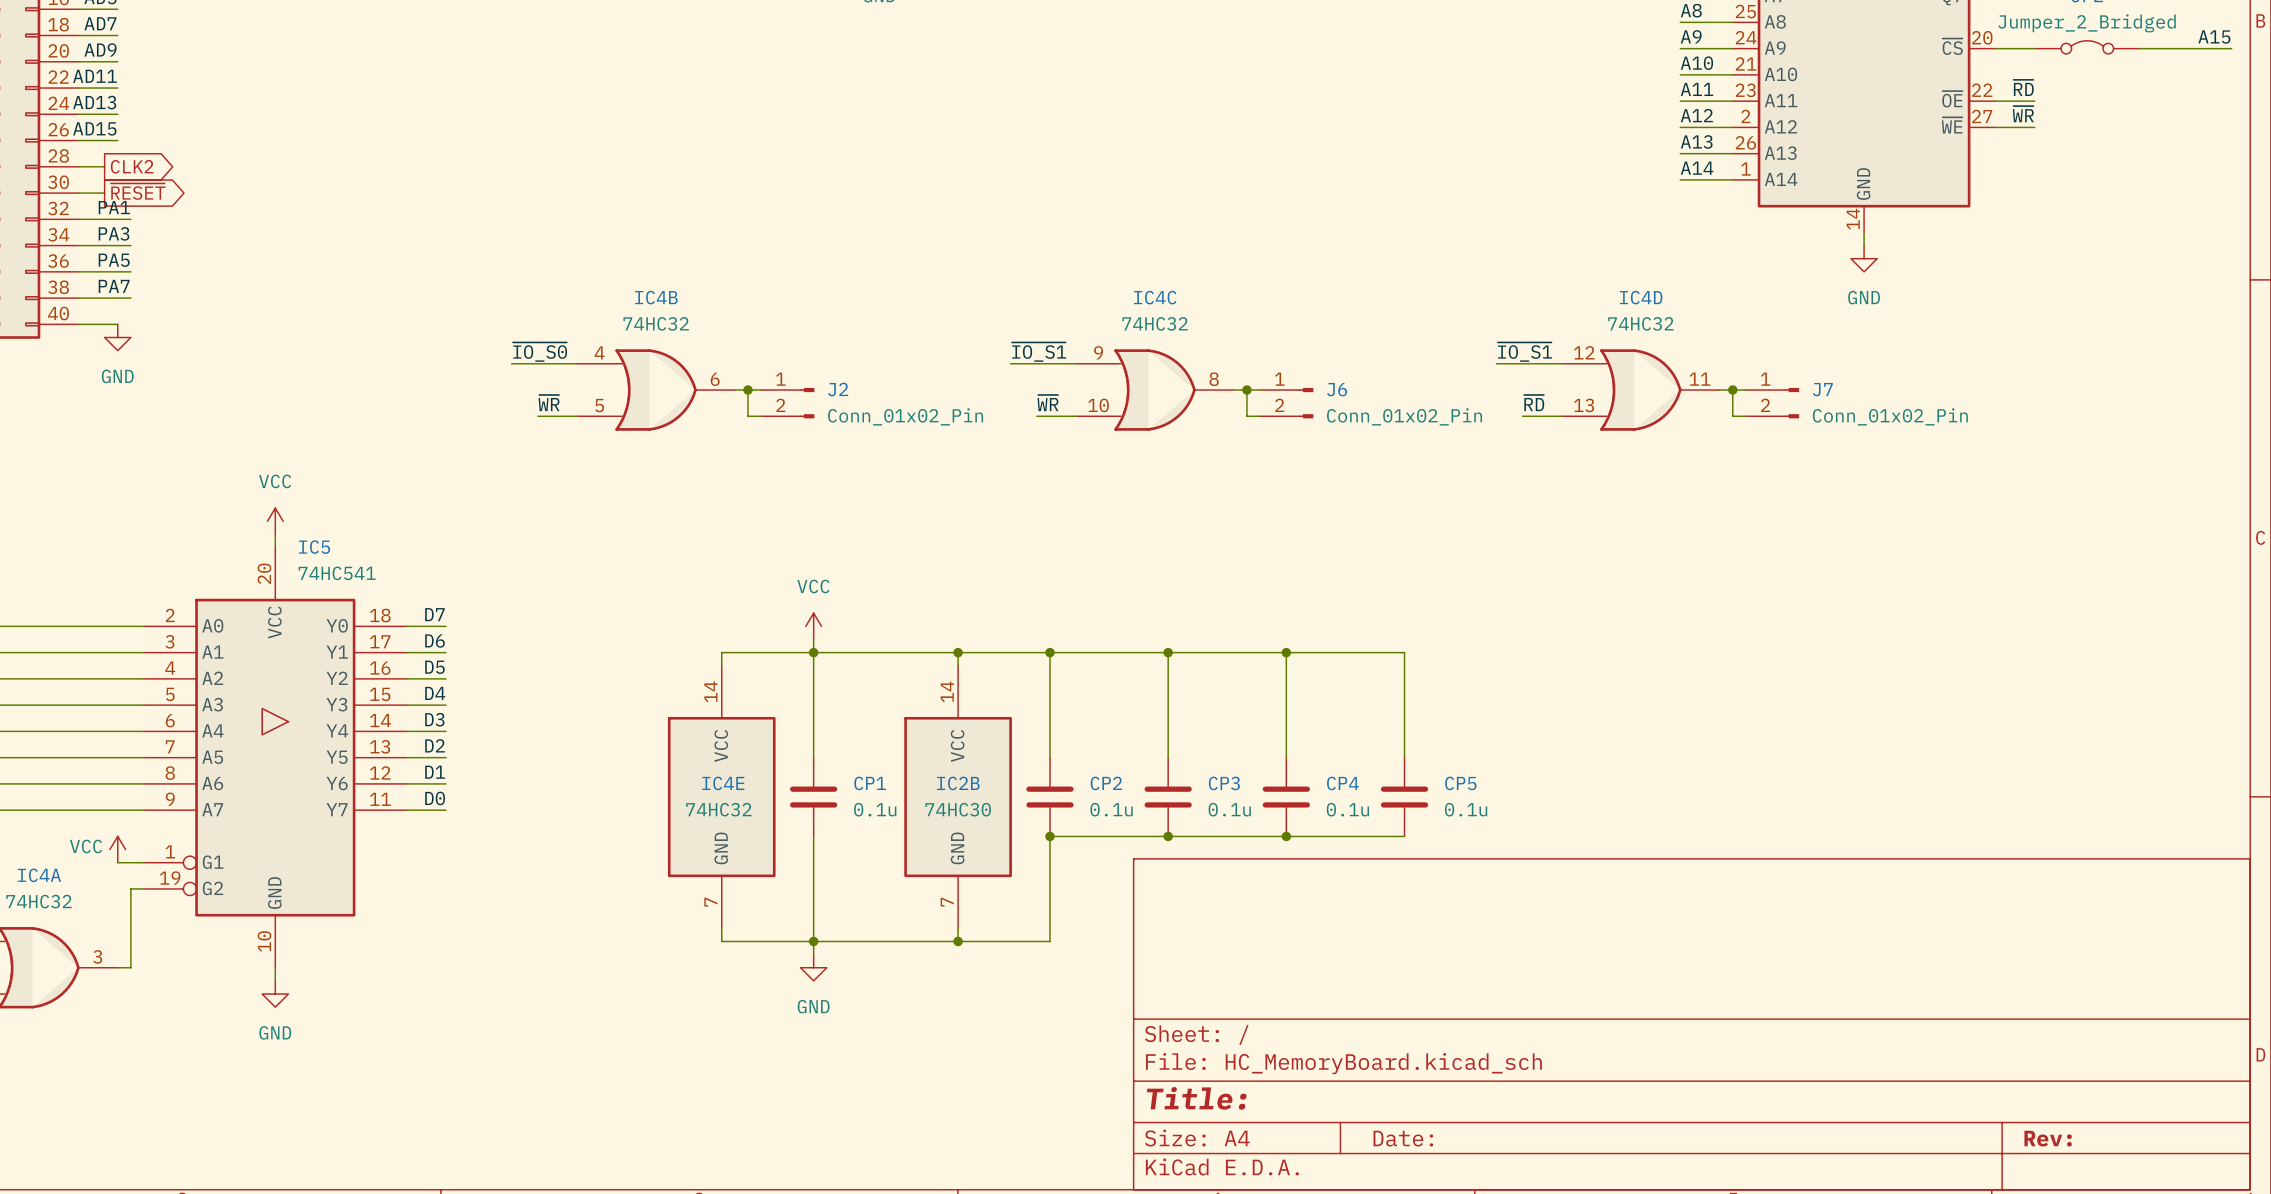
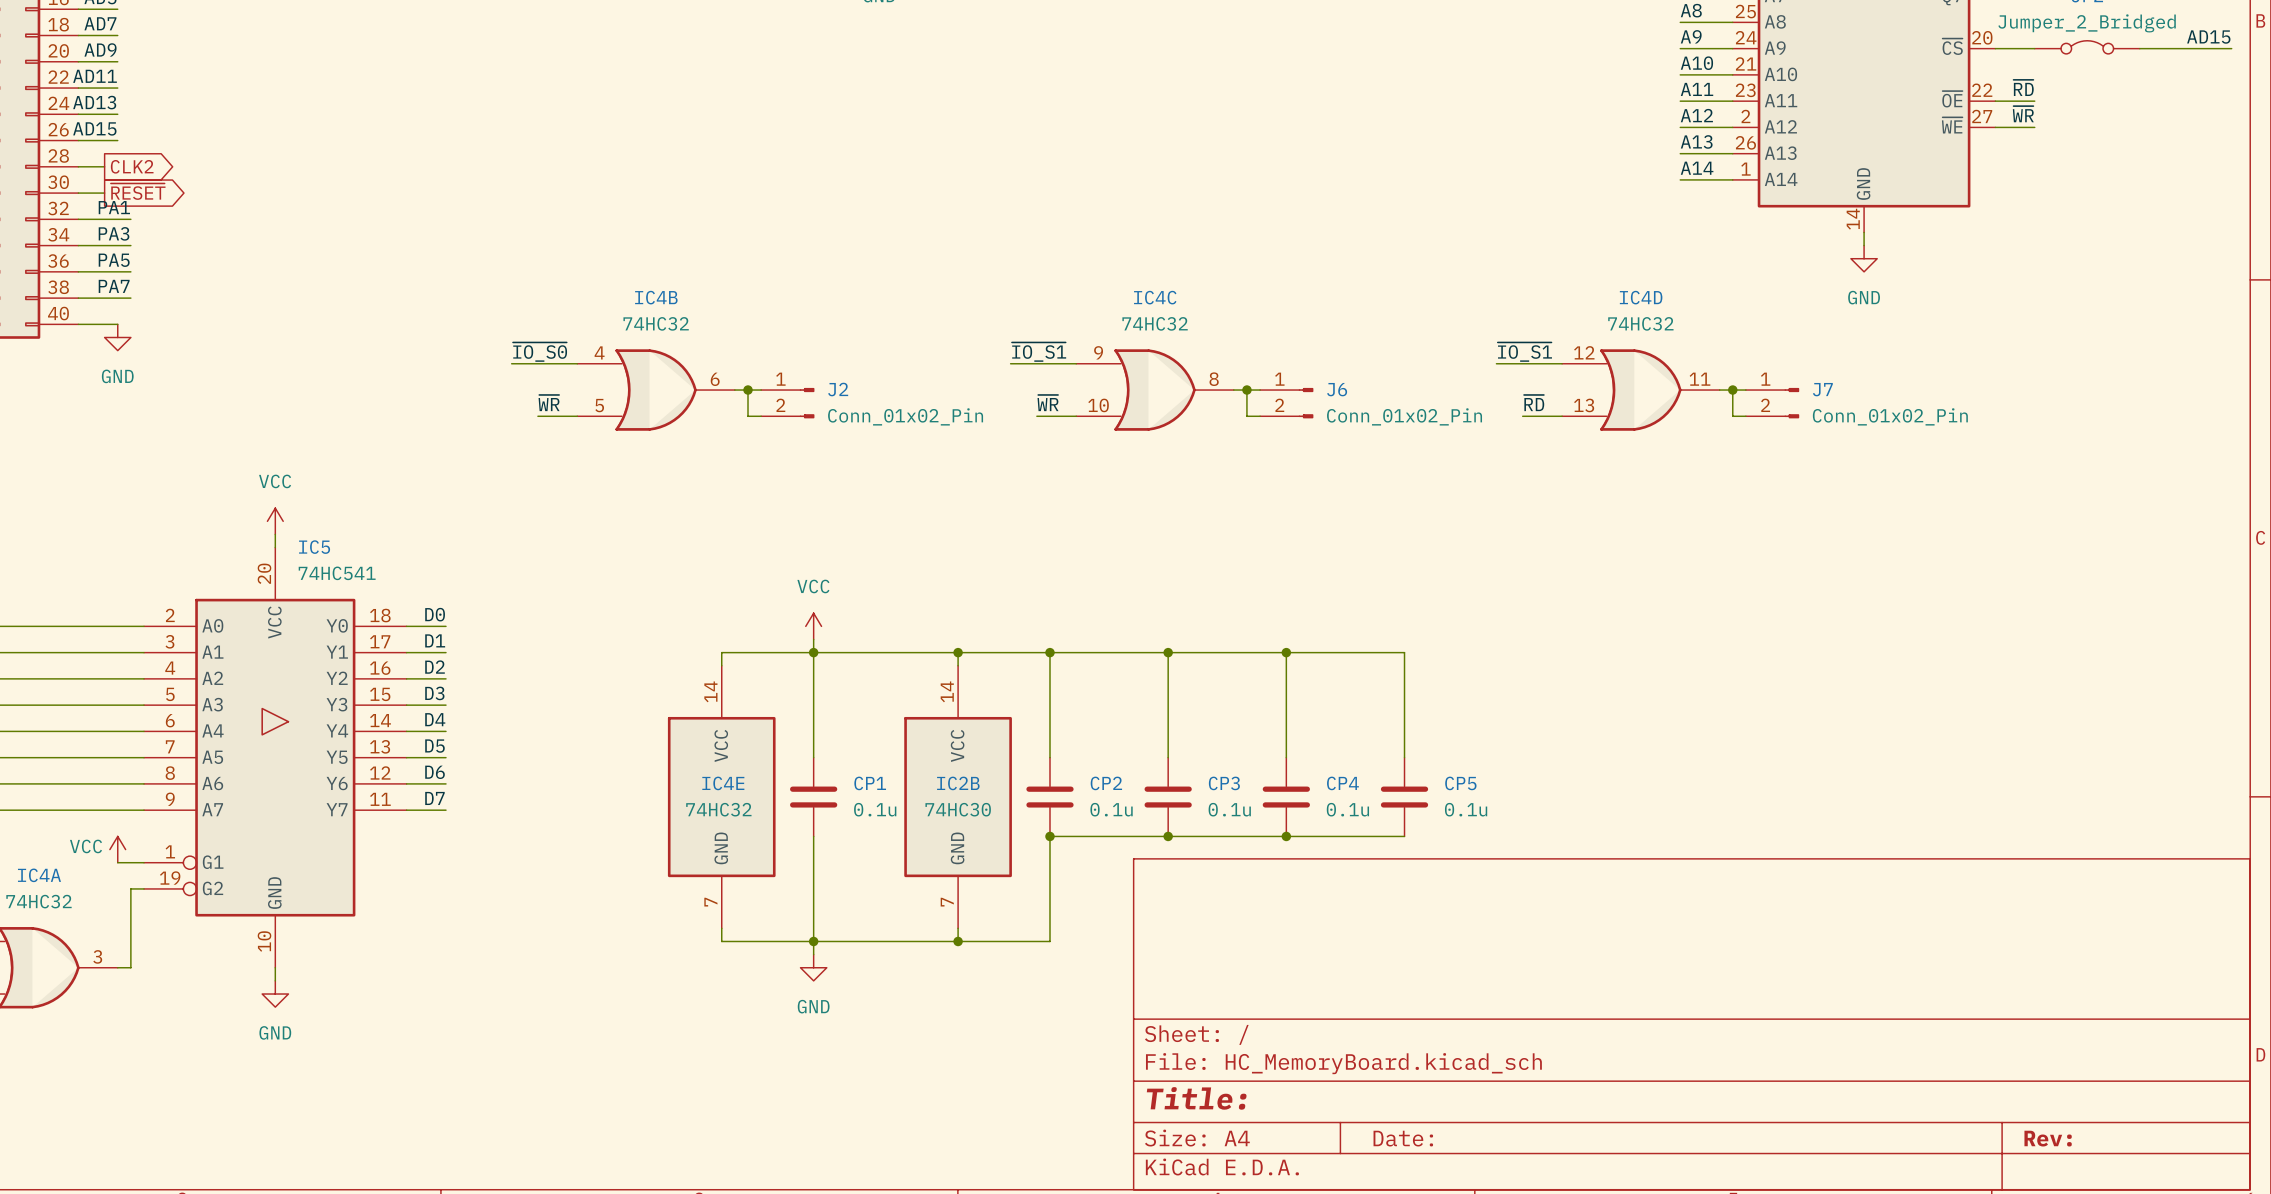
label: A15 (2214, 37) -> AD15 (2208, 37)
label: D7 (434, 614) -> D0 (435, 614)
label: D6 (435, 641) -> D1 (435, 640)
label: D5 (434, 667) -> D2 (435, 667)
label: D4 (435, 693) -> D3 (434, 693)
label: D3 (434, 719) -> D4 (435, 719)
label: D2 (435, 745) -> D5 (434, 746)
label: D1 (435, 772) -> D6 (435, 772)
label: D0 (435, 798) -> D7 (434, 798)

